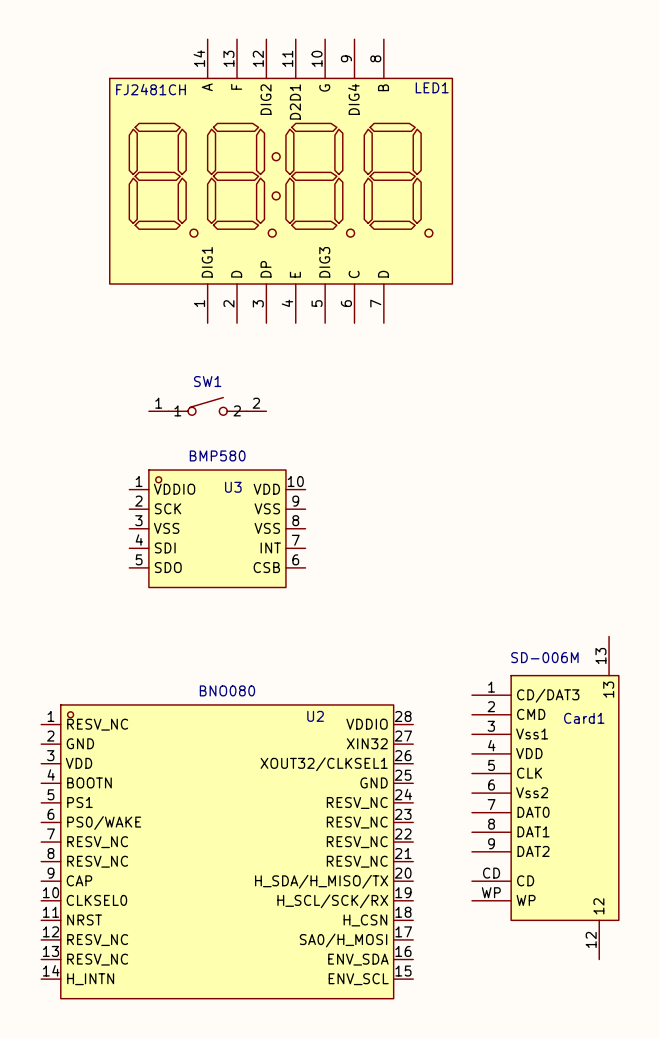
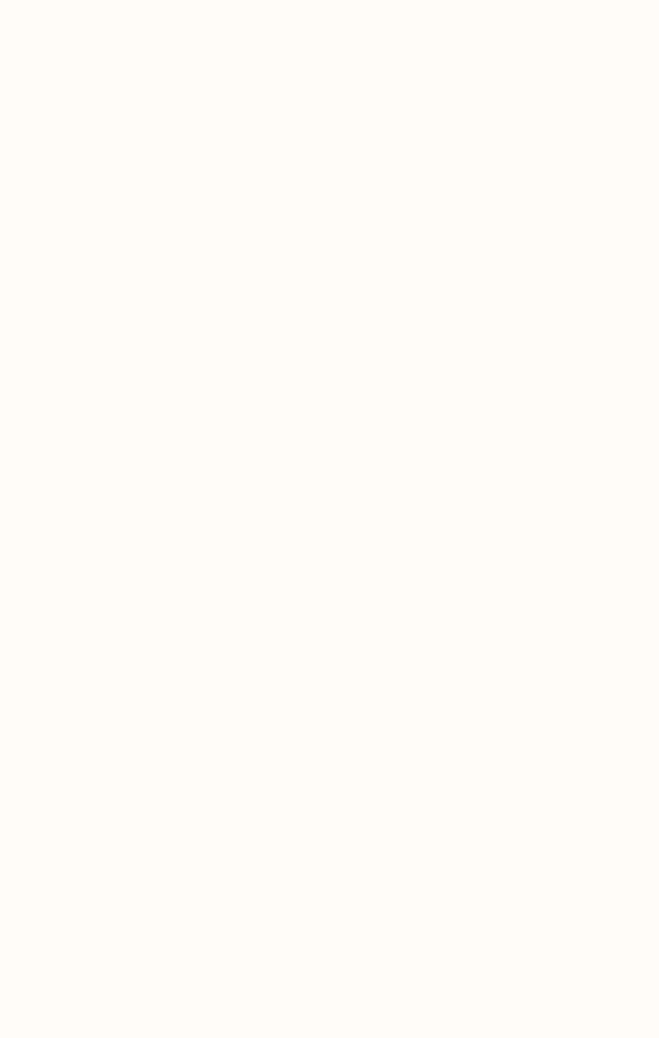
LED1: FJ2481CH (281, 181) -> none
SW1: (207, 406) -> none
U3: BMP580 (217, 528) -> none
Card1: SD-006M (545, 797) -> none
U2: BNO080 (227, 851) -> none

